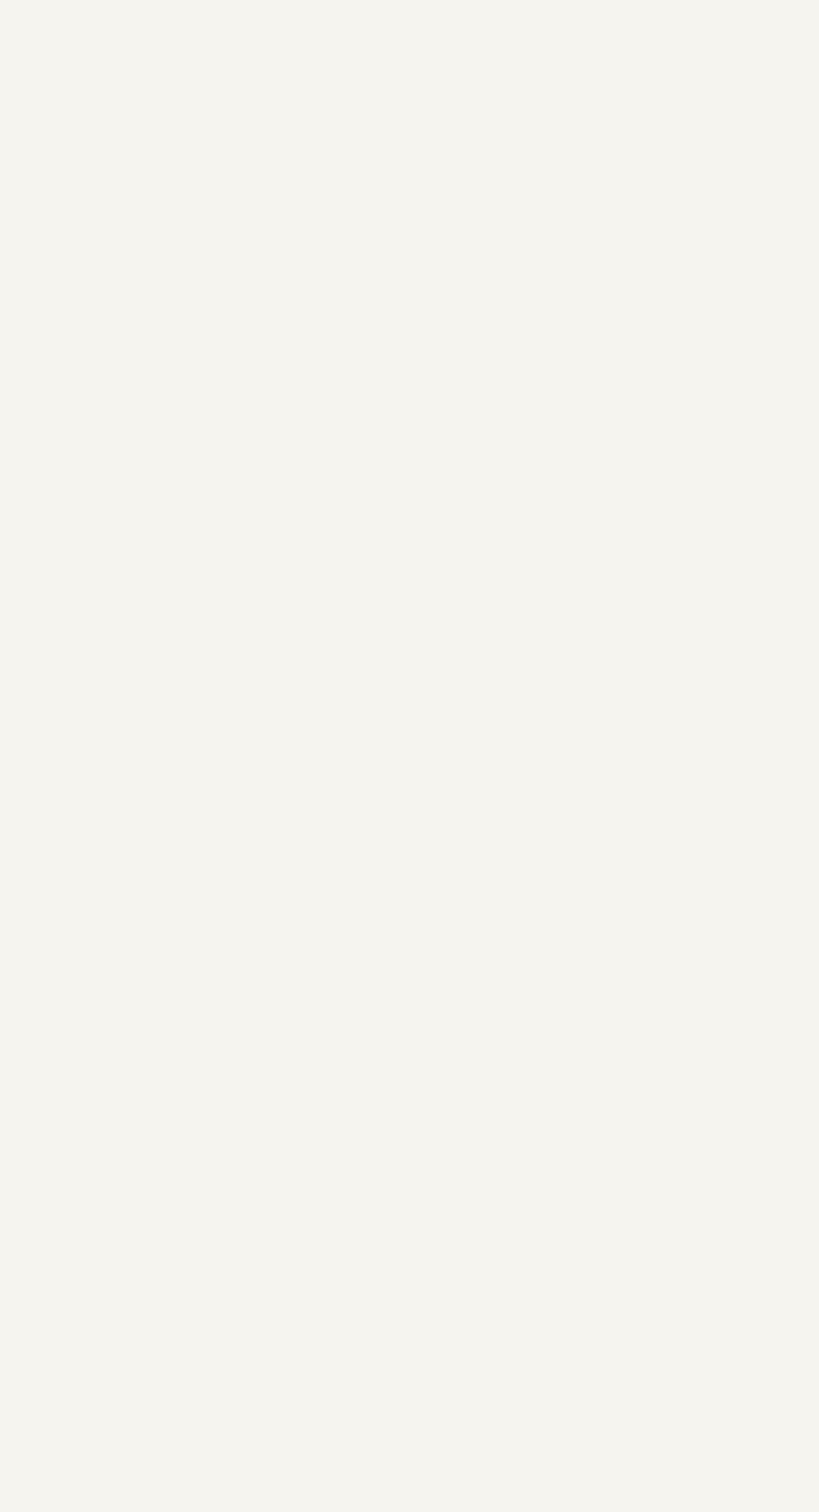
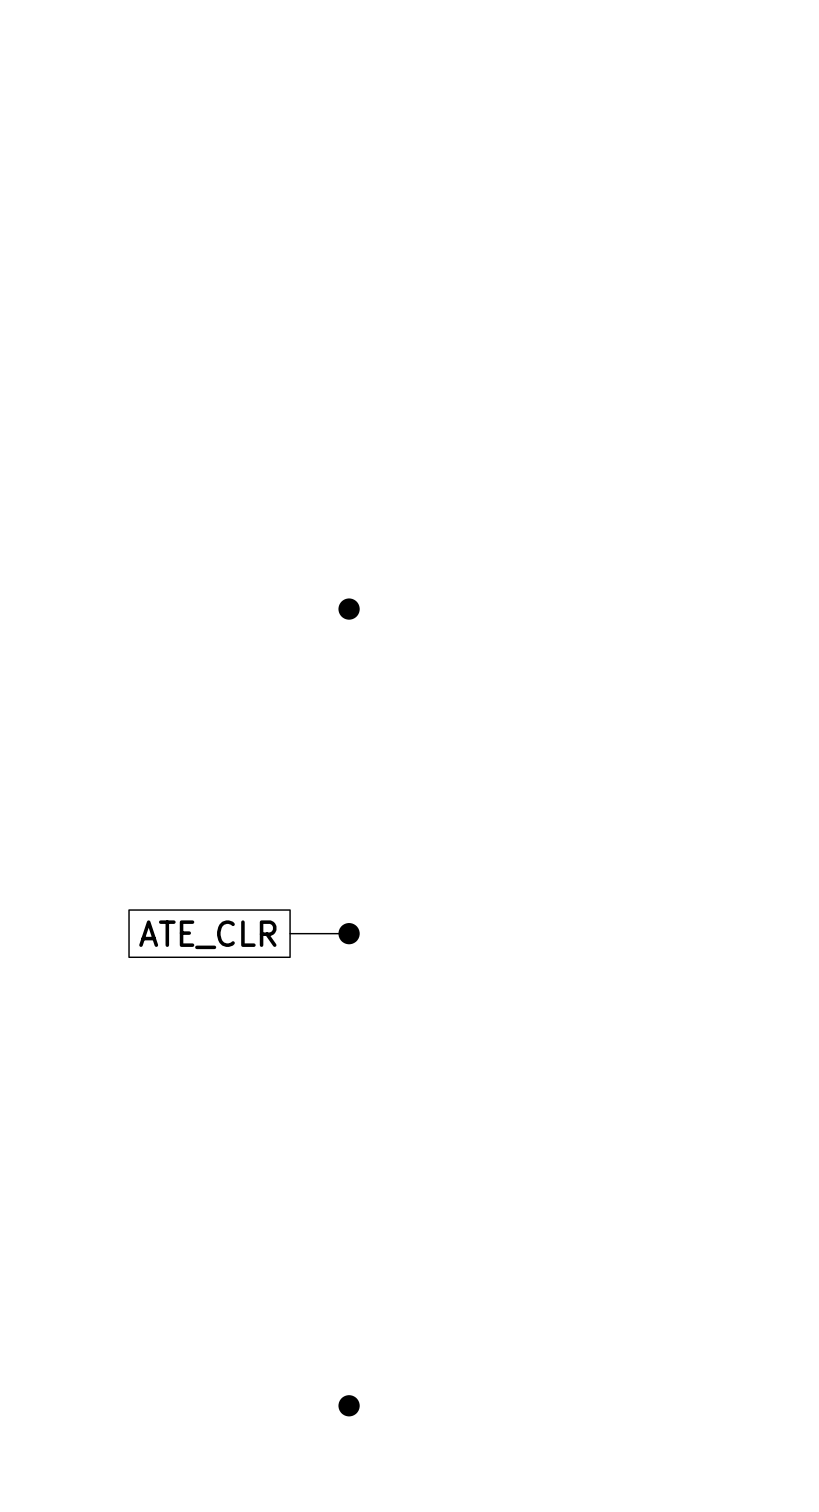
junction: none -> (349, 609)
wire: none -> (290, 933) (349, 933)
junction: none -> (349, 933)
global label: none -> ATE_CLR (207, 934)
junction: none -> (349, 1405)

